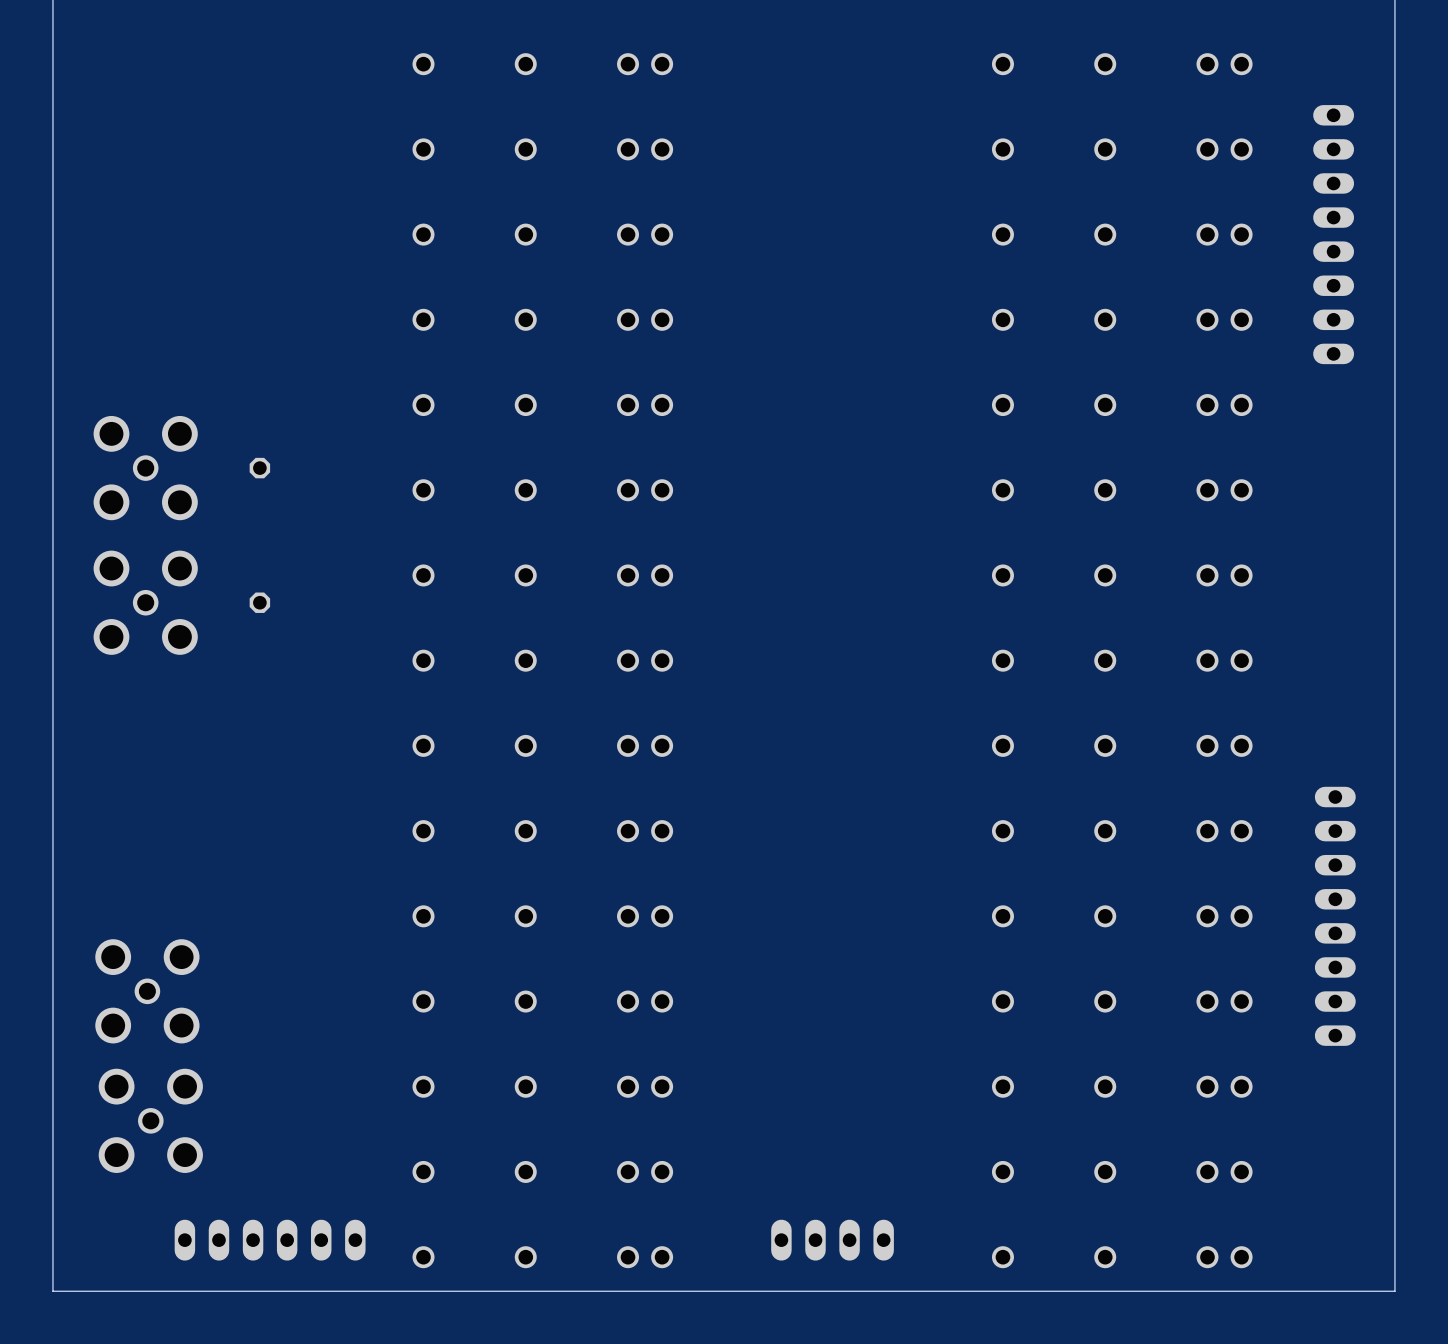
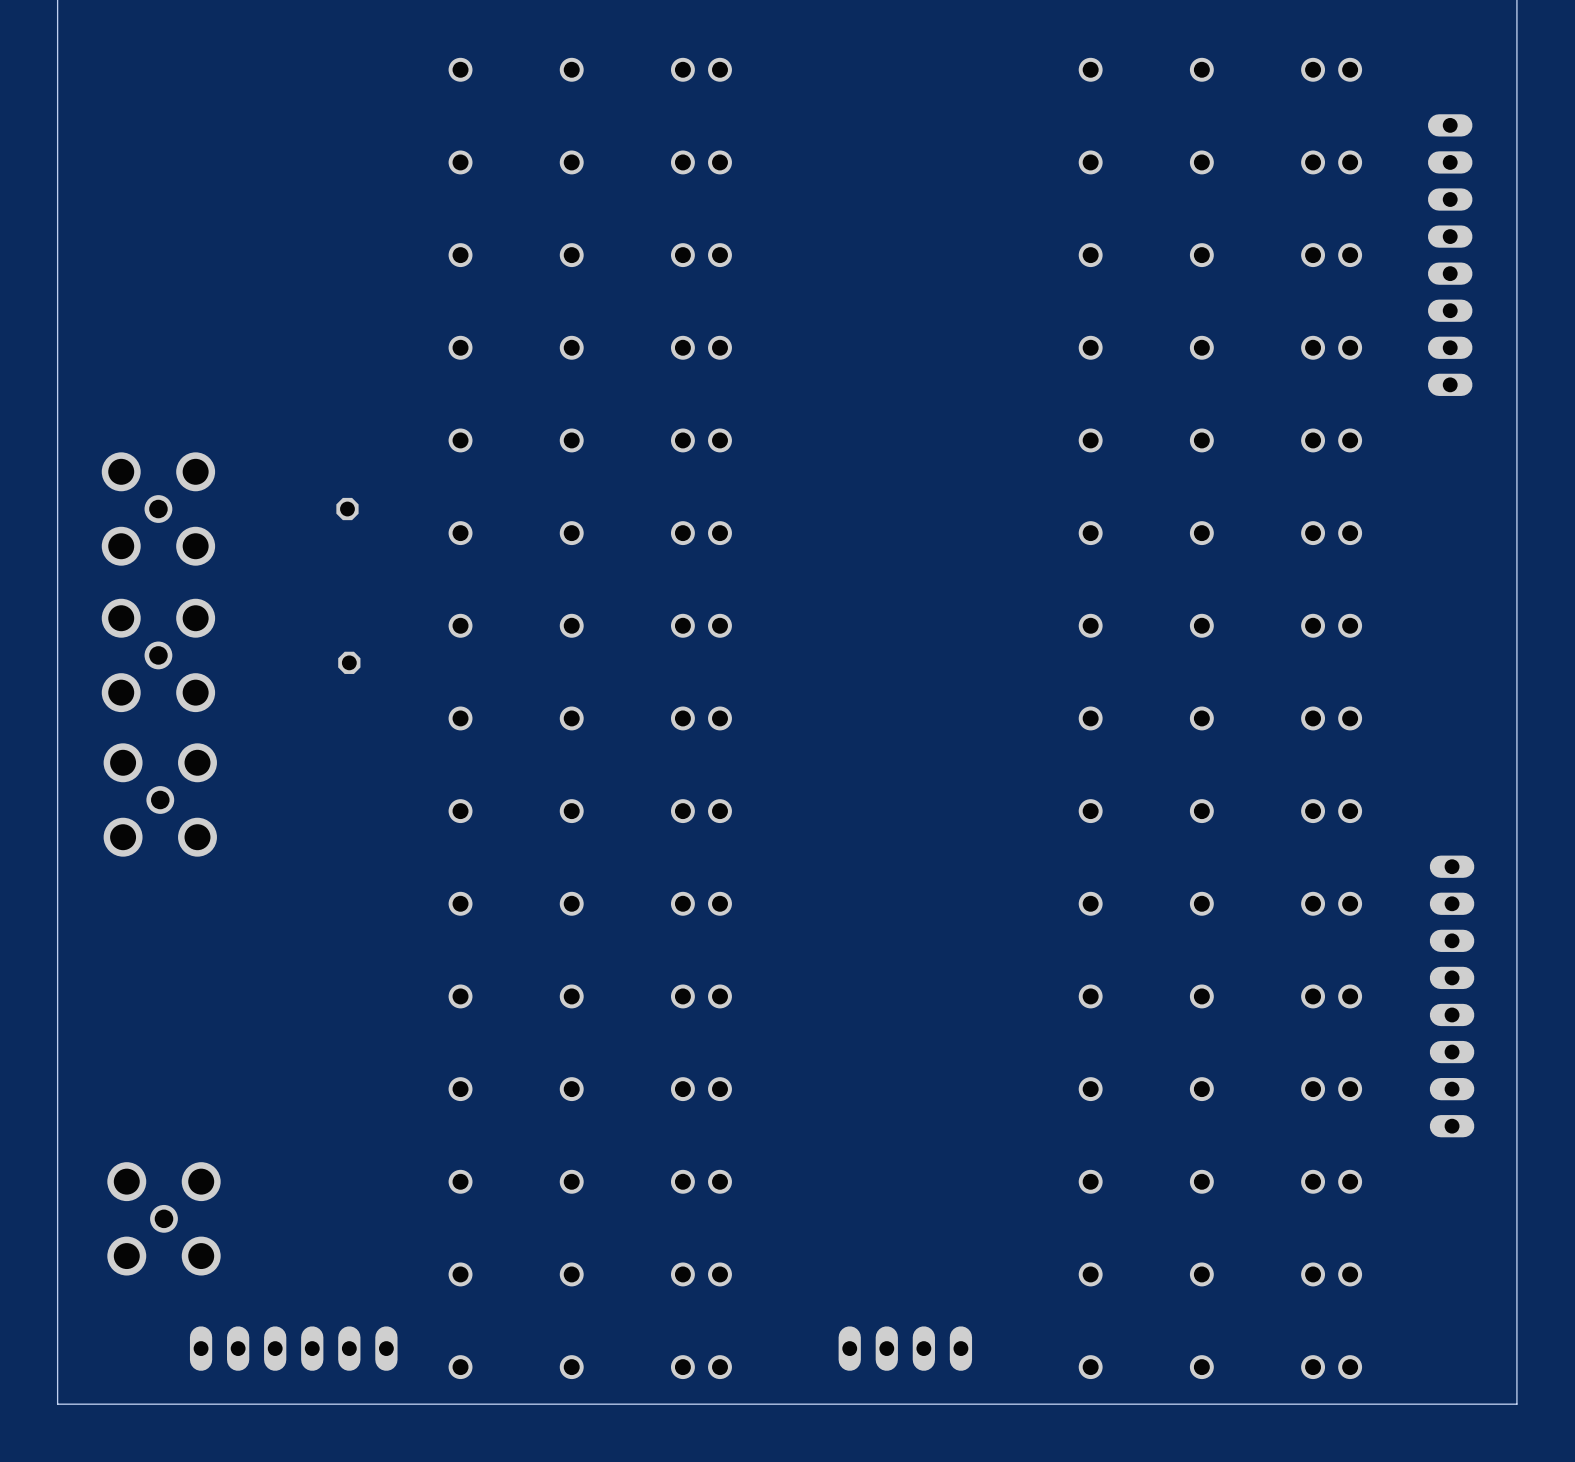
part position: (259, 468) -> (347, 509)
part position: (259, 602) -> (349, 662)
part position: (147, 991) -> (160, 799)

